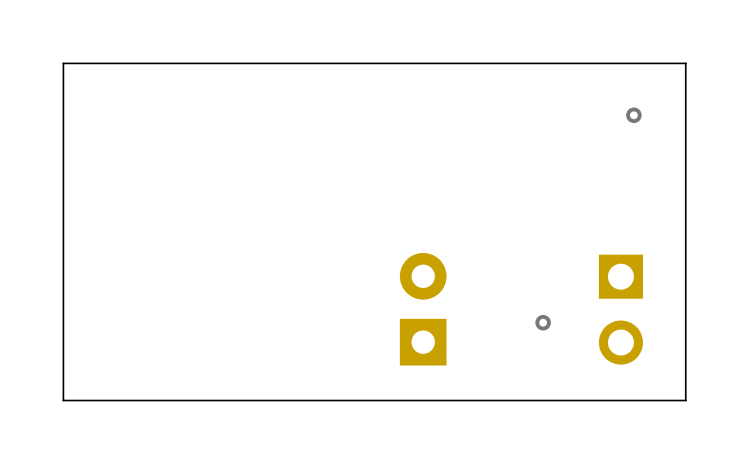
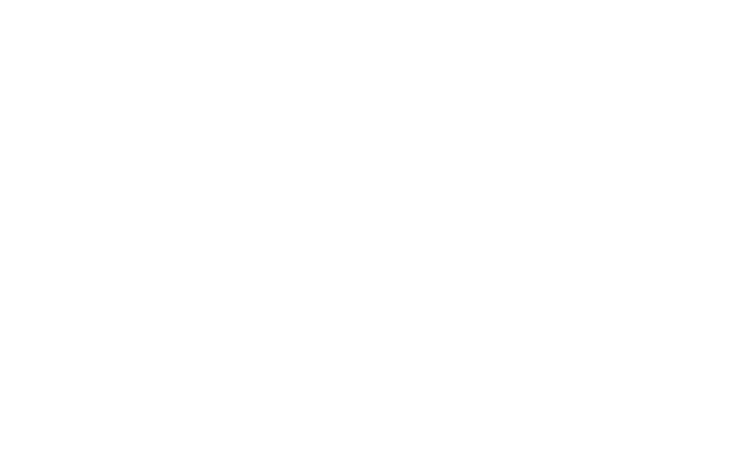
board edge: (685, 63) (63, 63) (63, 400) (685, 400) (685, 63) -> none
via: (633, 115) -> none
part: (423, 309) -> none
part: (620, 309) -> none
via: (543, 322) -> none

